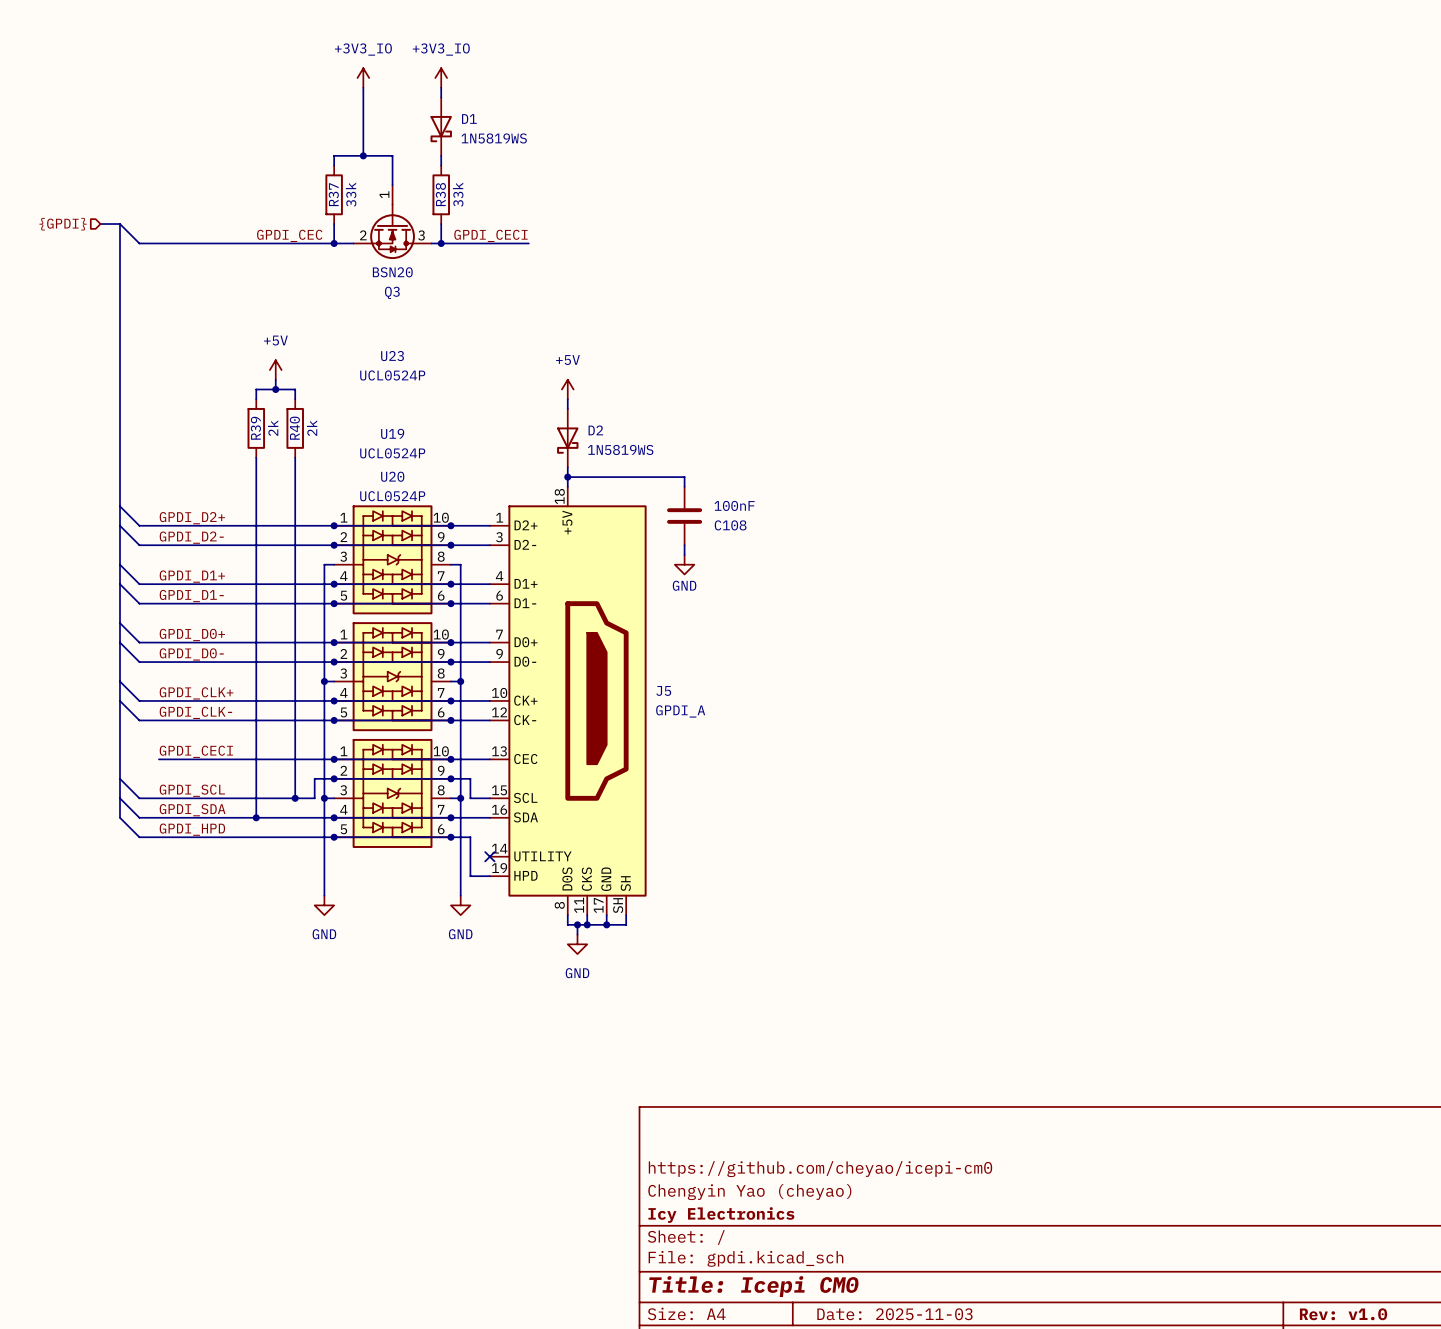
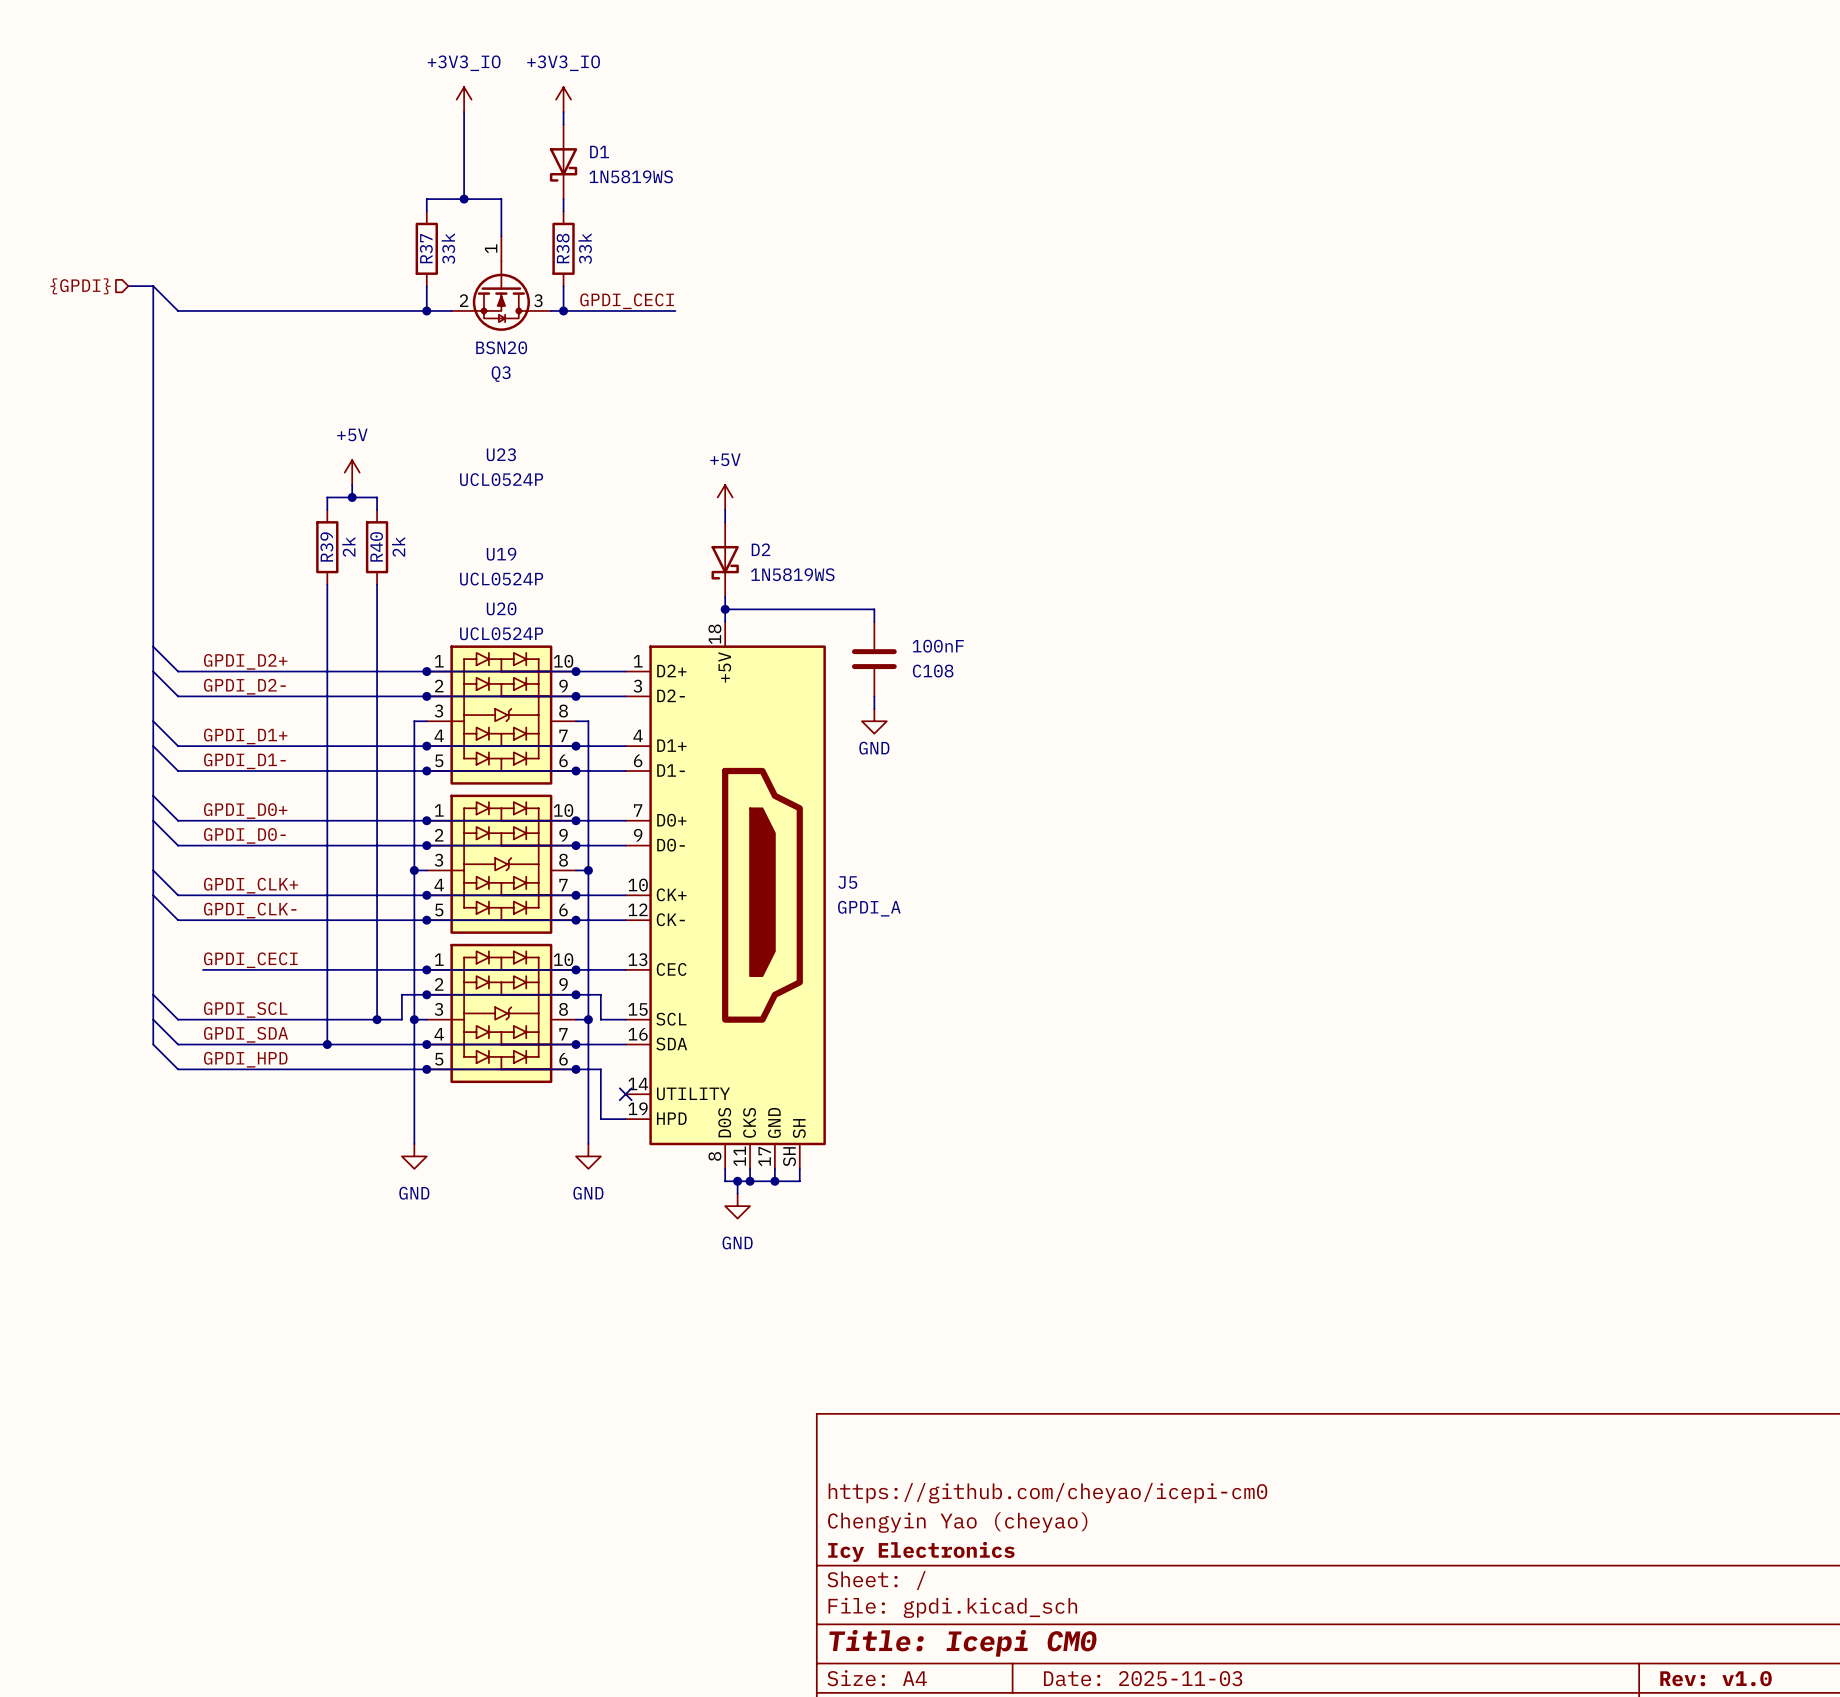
label: GPDI_CEC (289, 235) -> none

